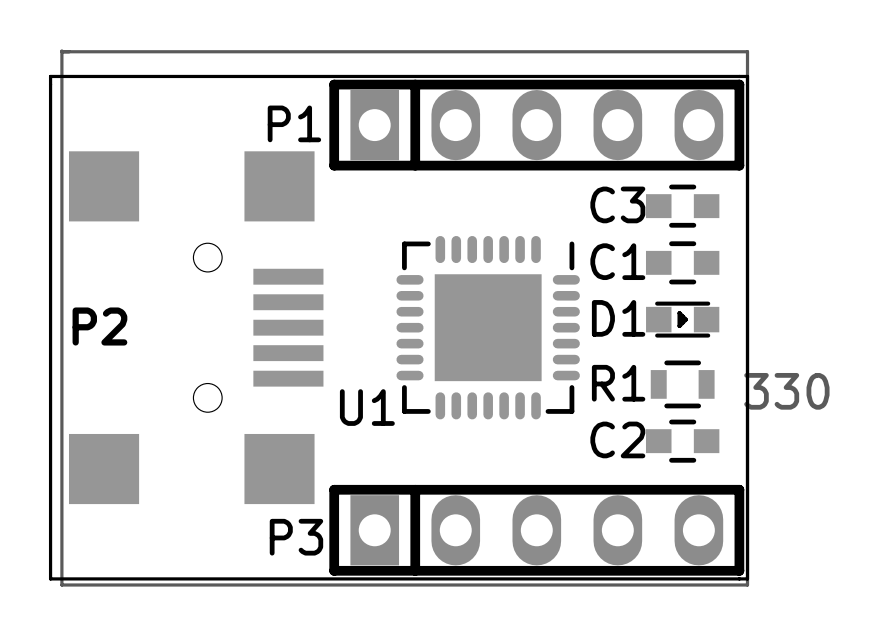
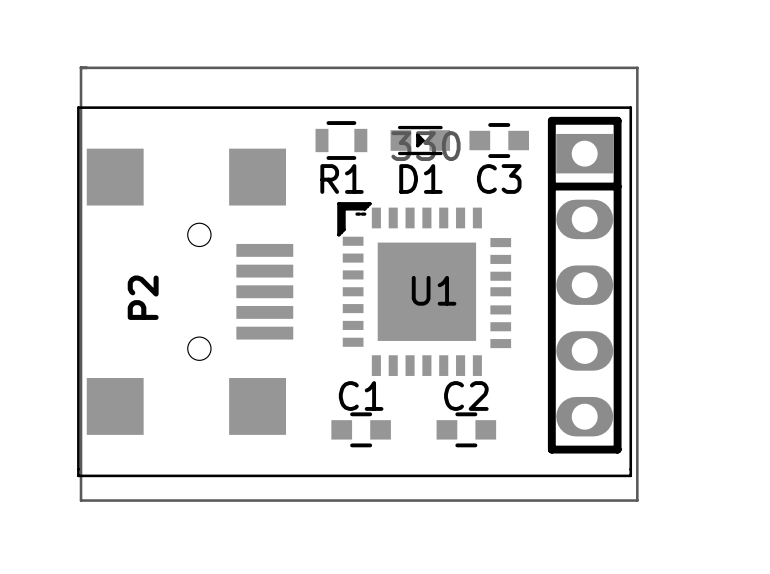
board edge: (50, 76) (747, 76) (747, 578) (50, 578) (50, 76) -> (78, 107) (78, 475) (630, 475) (630, 107) (78, 107)
P1: (536, 125) -> none
C3 name position: C3 (617, 204) -> C3 (499, 179)
C3 position: (682, 206) -> (499, 140)
U1 footprint: [396, 235, 580, 420] -> [337, 202, 512, 376]
C1 name position: C1 (617, 261) -> C1 (361, 396)
C1 position: (682, 262) -> (361, 429)
D1 name position: D1 (618, 318) -> D1 (420, 179)
D1 position: (682, 319) -> (420, 140)
part: none -> (584, 285)
P2 name rotation: 0° (99, 326) -> 90° counterclockwise (143, 297)
R1 name position: R1 (618, 383) -> R1 (342, 179)
R1 position: (682, 384) -> (341, 140)
U1 name position: U1 (367, 407) -> U1 (434, 290)
C2 name position: C2 (617, 439) -> C2 (466, 396)
C2 position: (682, 441) -> (466, 429)
P3: (536, 530) -> none

